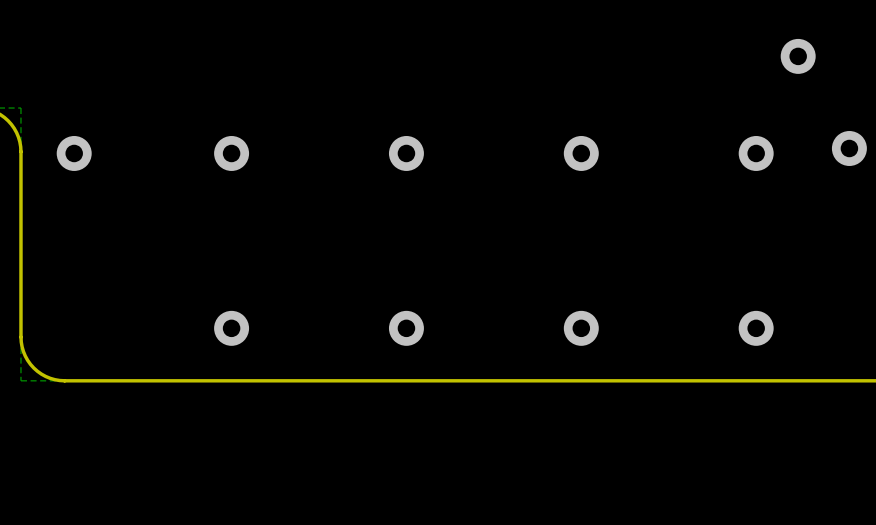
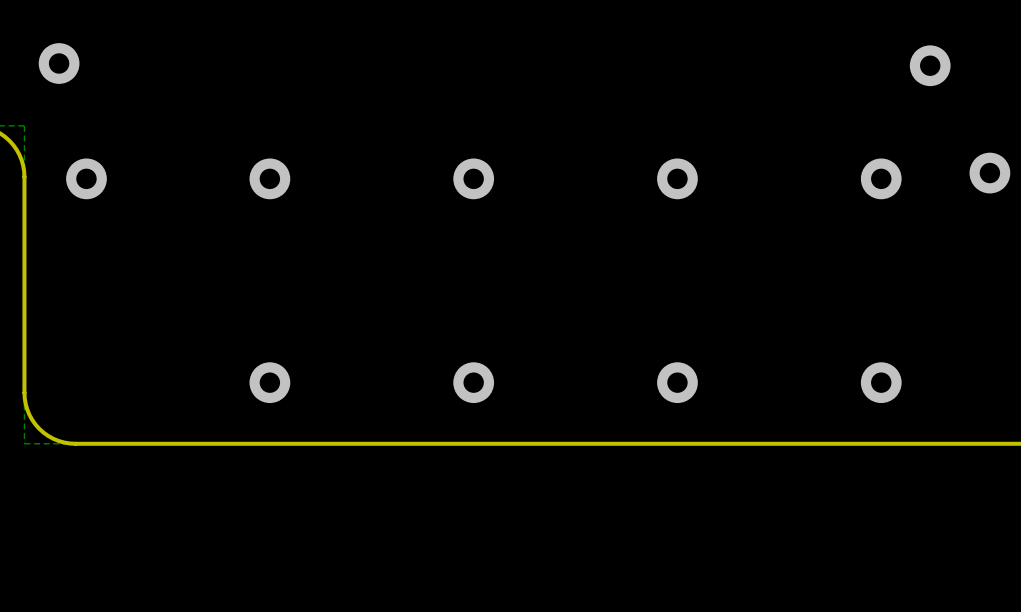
via: none -> (59, 63)

